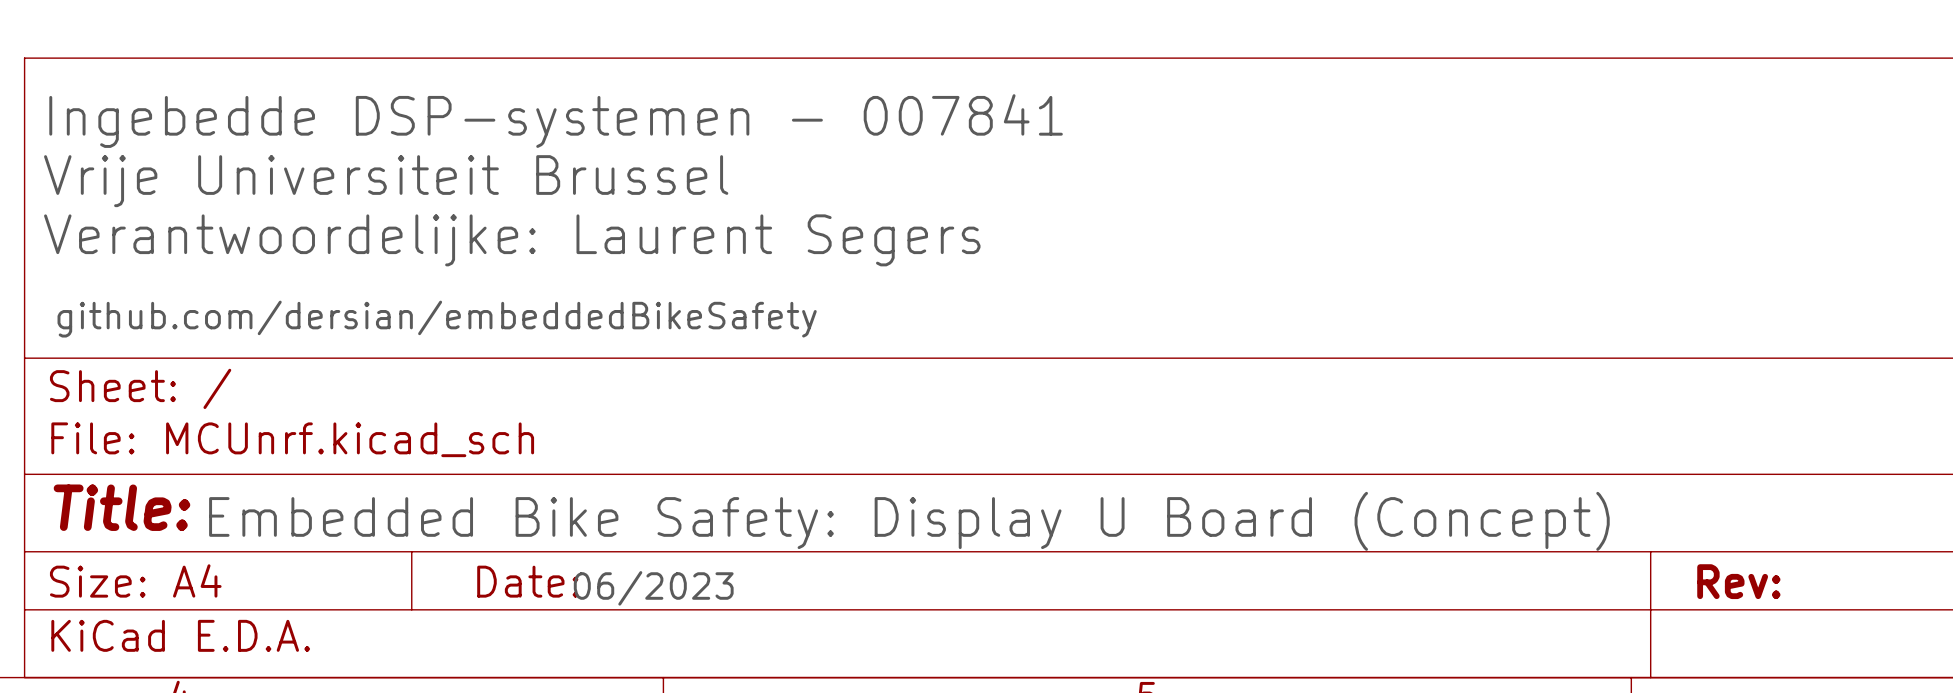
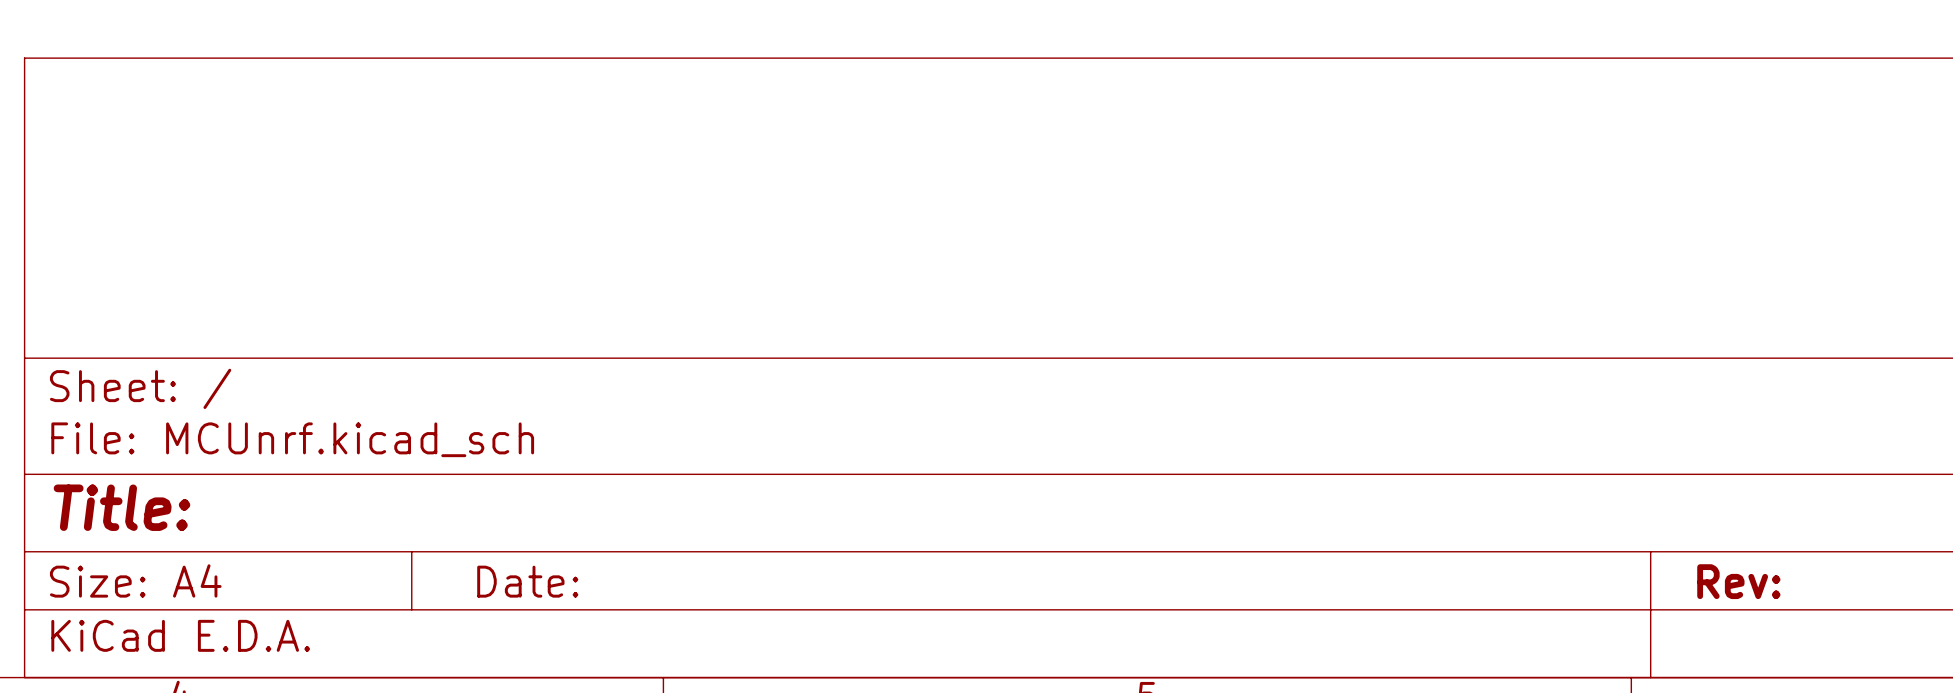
text: Ingebedde DSP-systemen - 007841 (556, 121) -> none
text: Vrije Universiteit Brussel (386, 181) -> none
text: Verantwoordelijke: Laurent Segers (512, 240) -> none
text: github.com/dersian/embeddedBikeSafety (437, 319) -> none
text: Embedded Bike Safety: Display U Board (Concept) (909, 521) -> none
text: 06/2023 (653, 588) -> none

